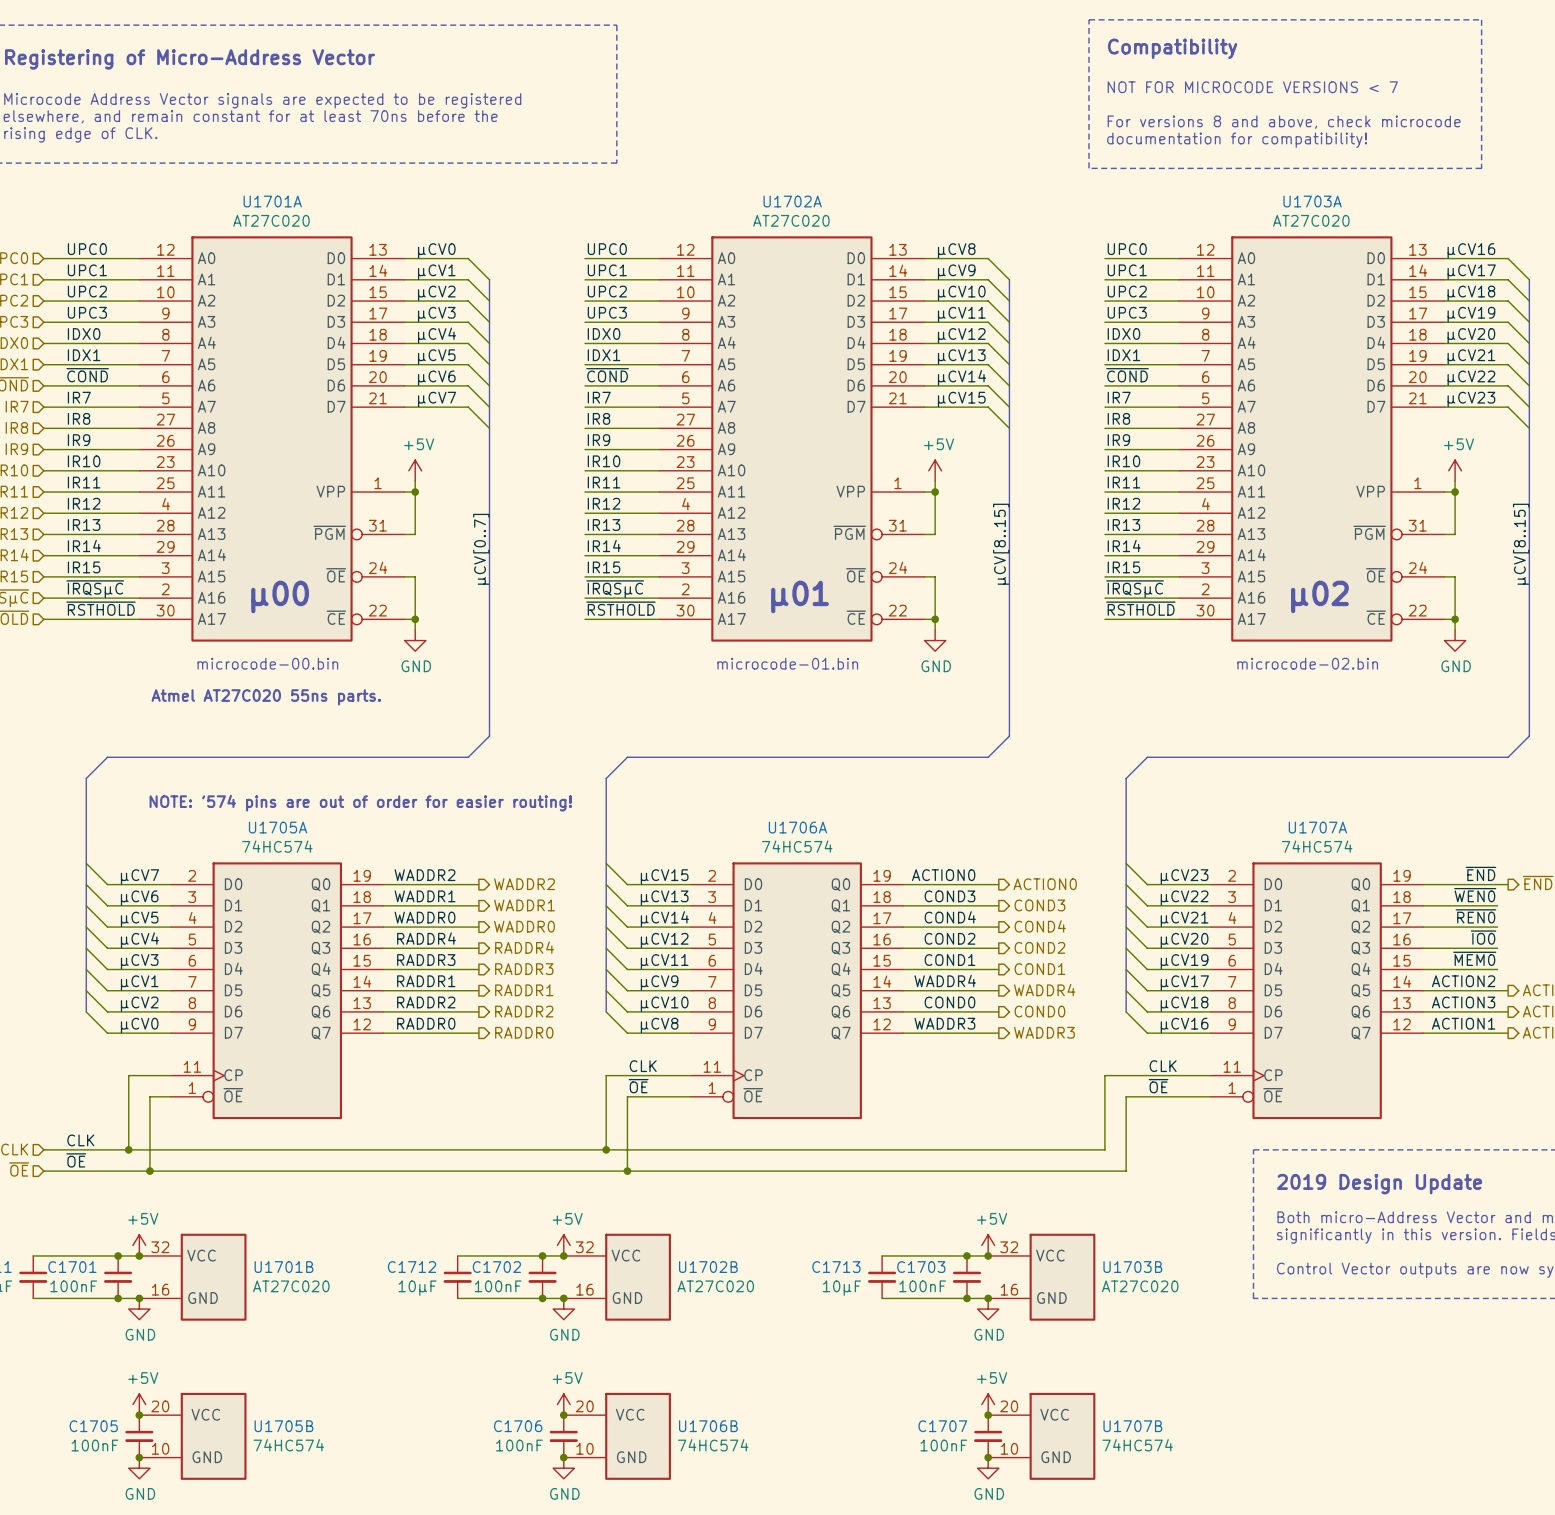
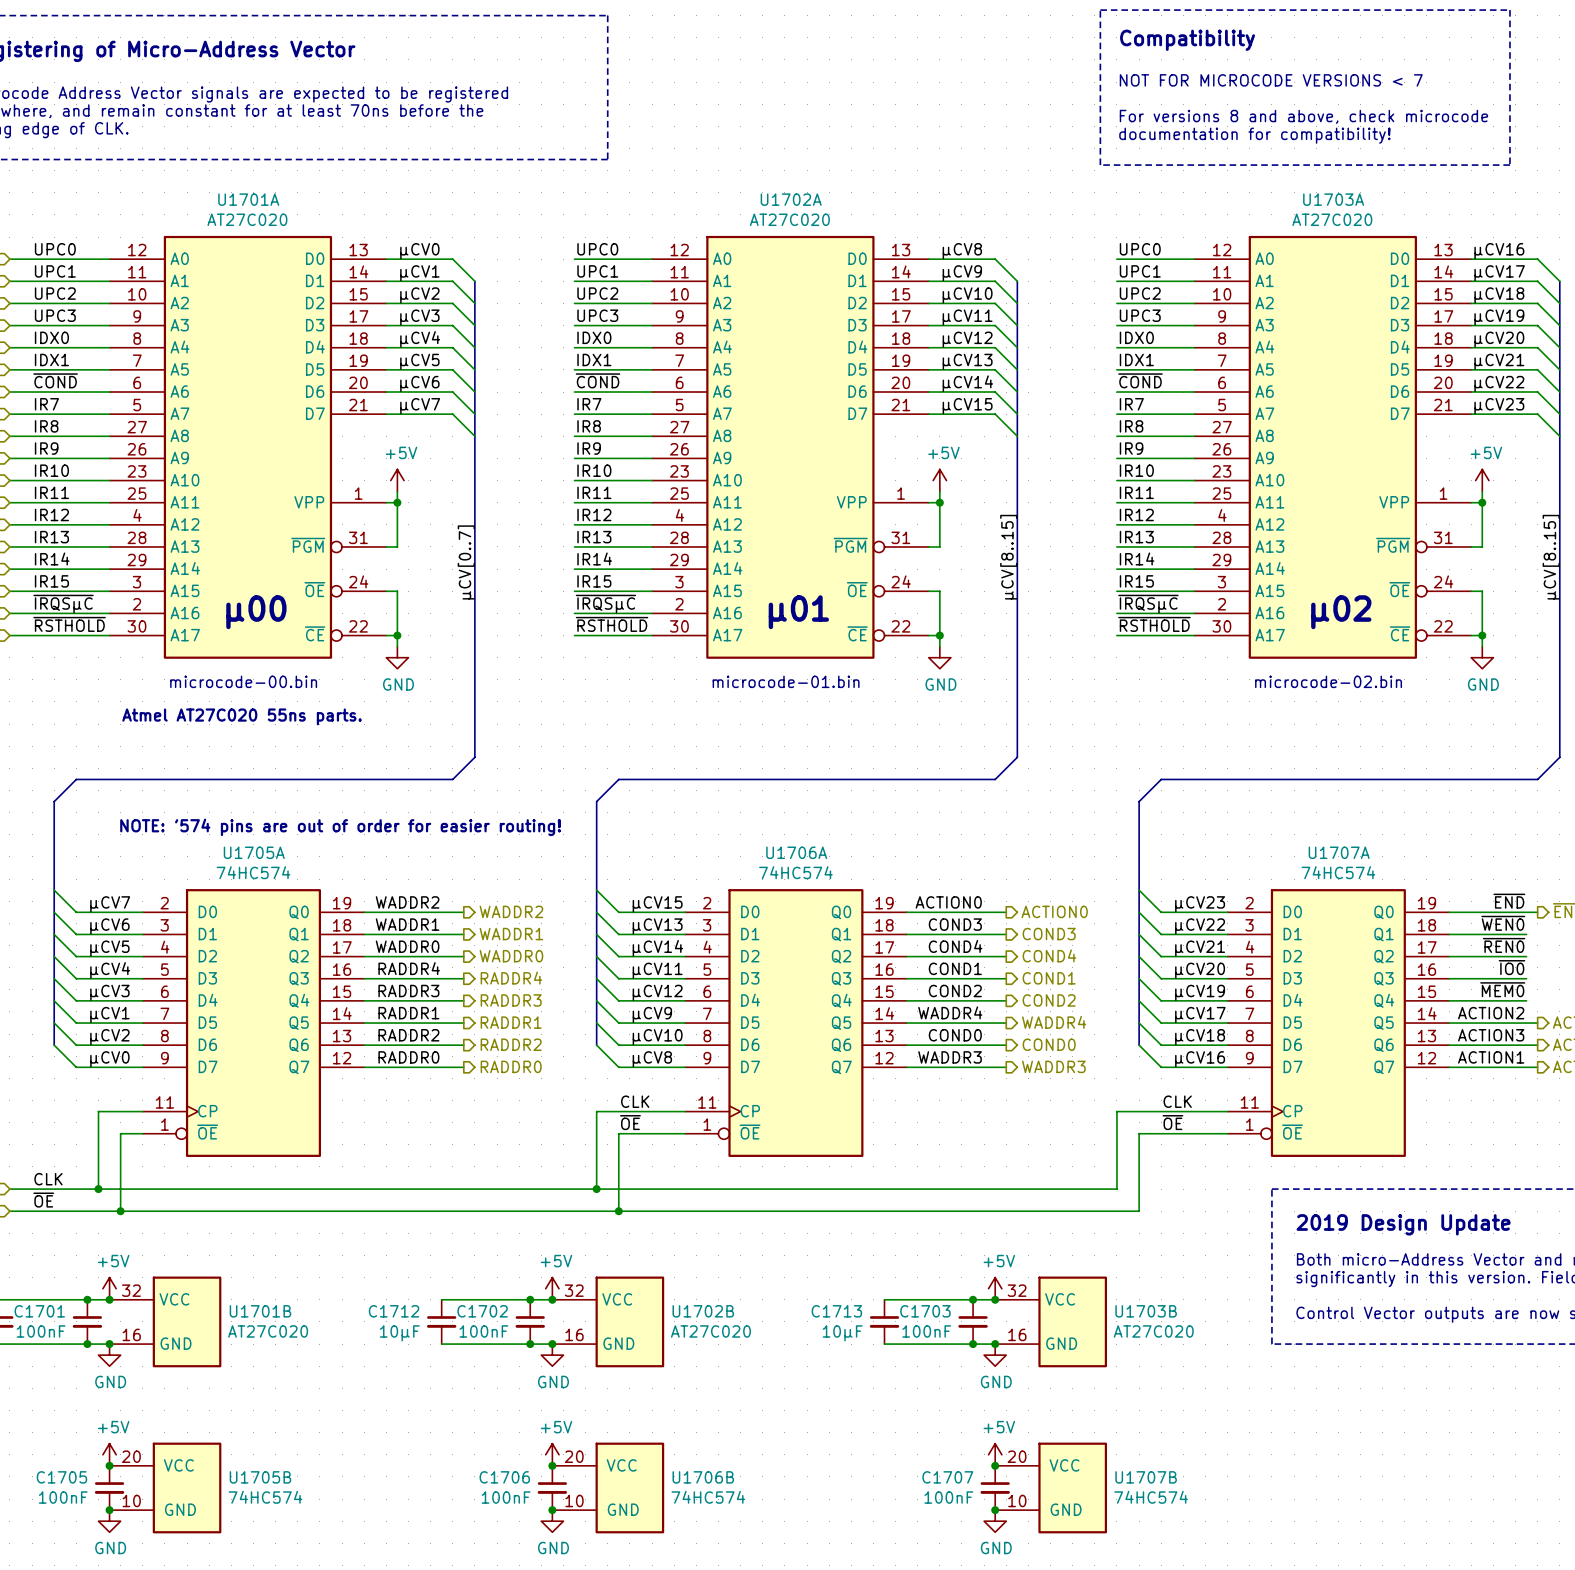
label: COND2 (949, 938) -> COND1 (955, 968)
label: µCV12 (664, 940) -> µCV11 (657, 970)
hierarchical label: COND2 (1039, 947) -> COND1 (1049, 978)
label: COND1 (949, 960) -> COND2 (955, 991)
label: µCV11 (664, 961) -> µCV12 (657, 992)
hierarchical label: COND1 (1039, 969) -> COND2 (1049, 1000)

